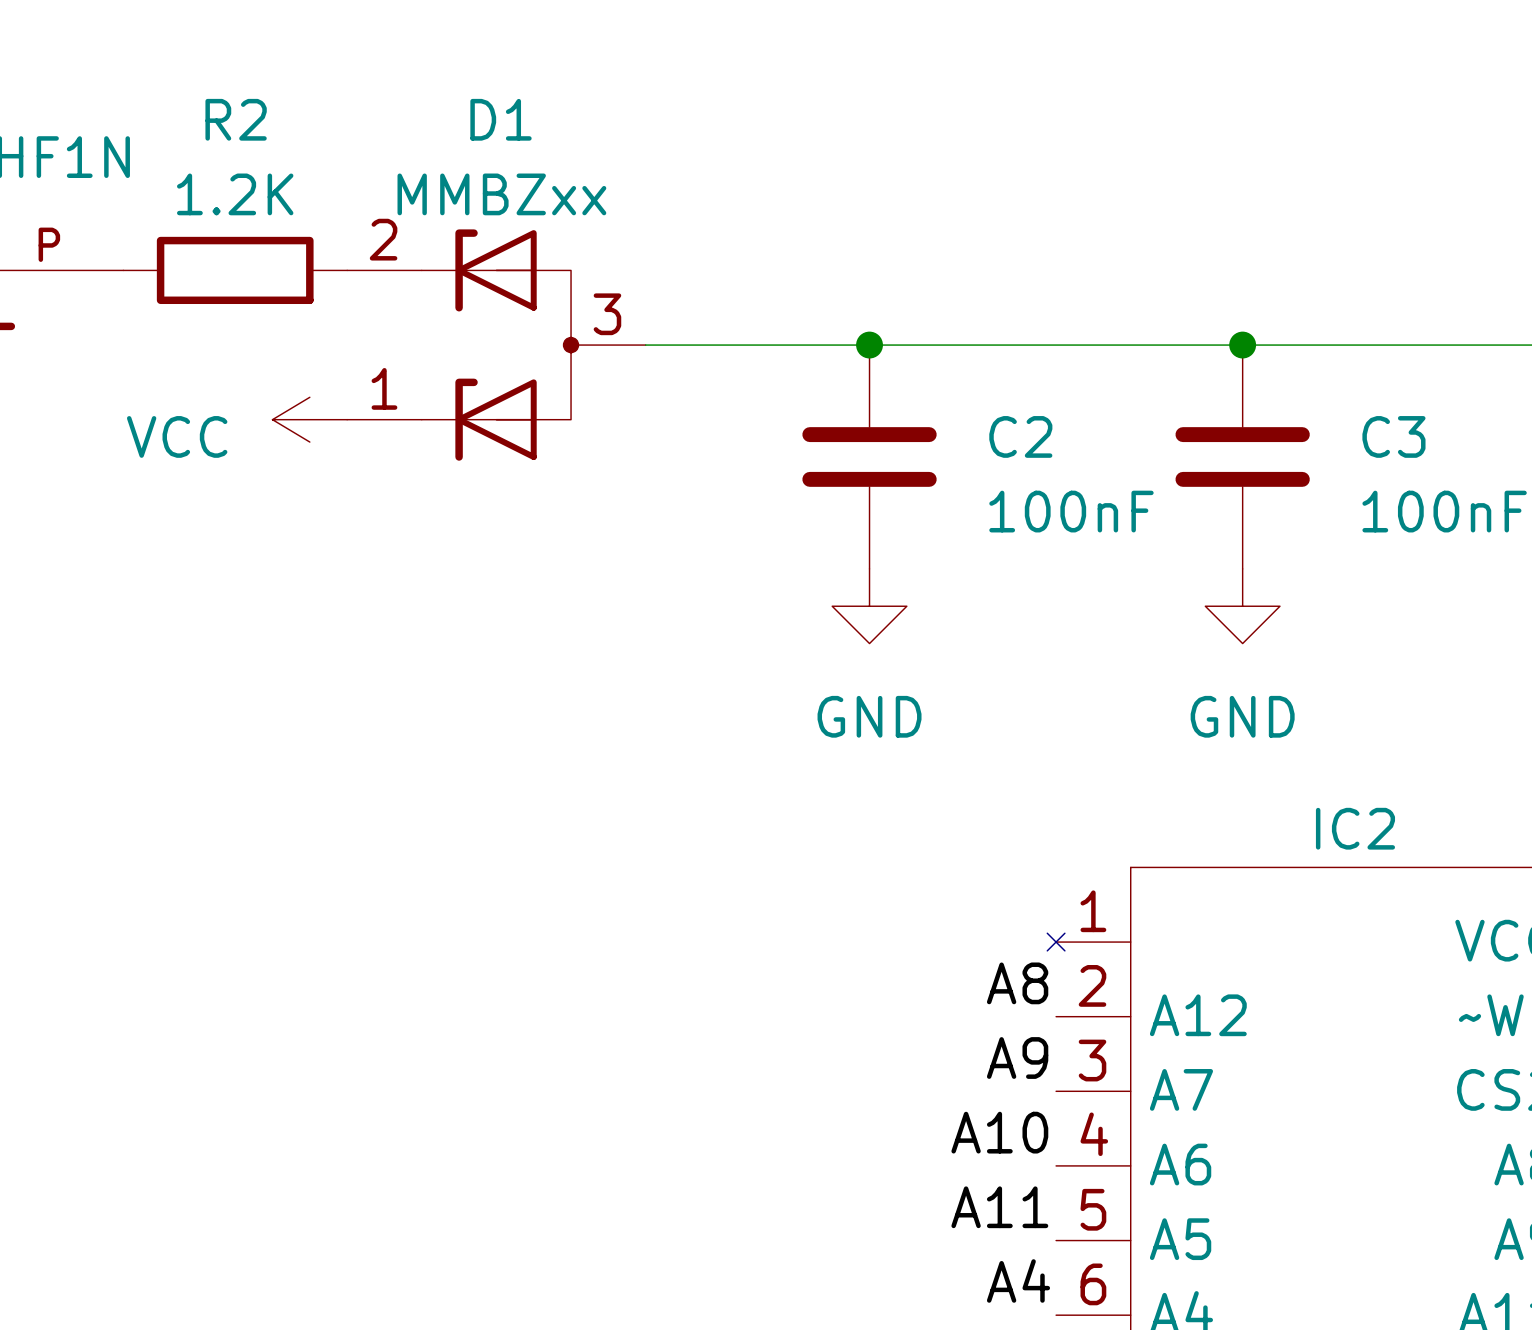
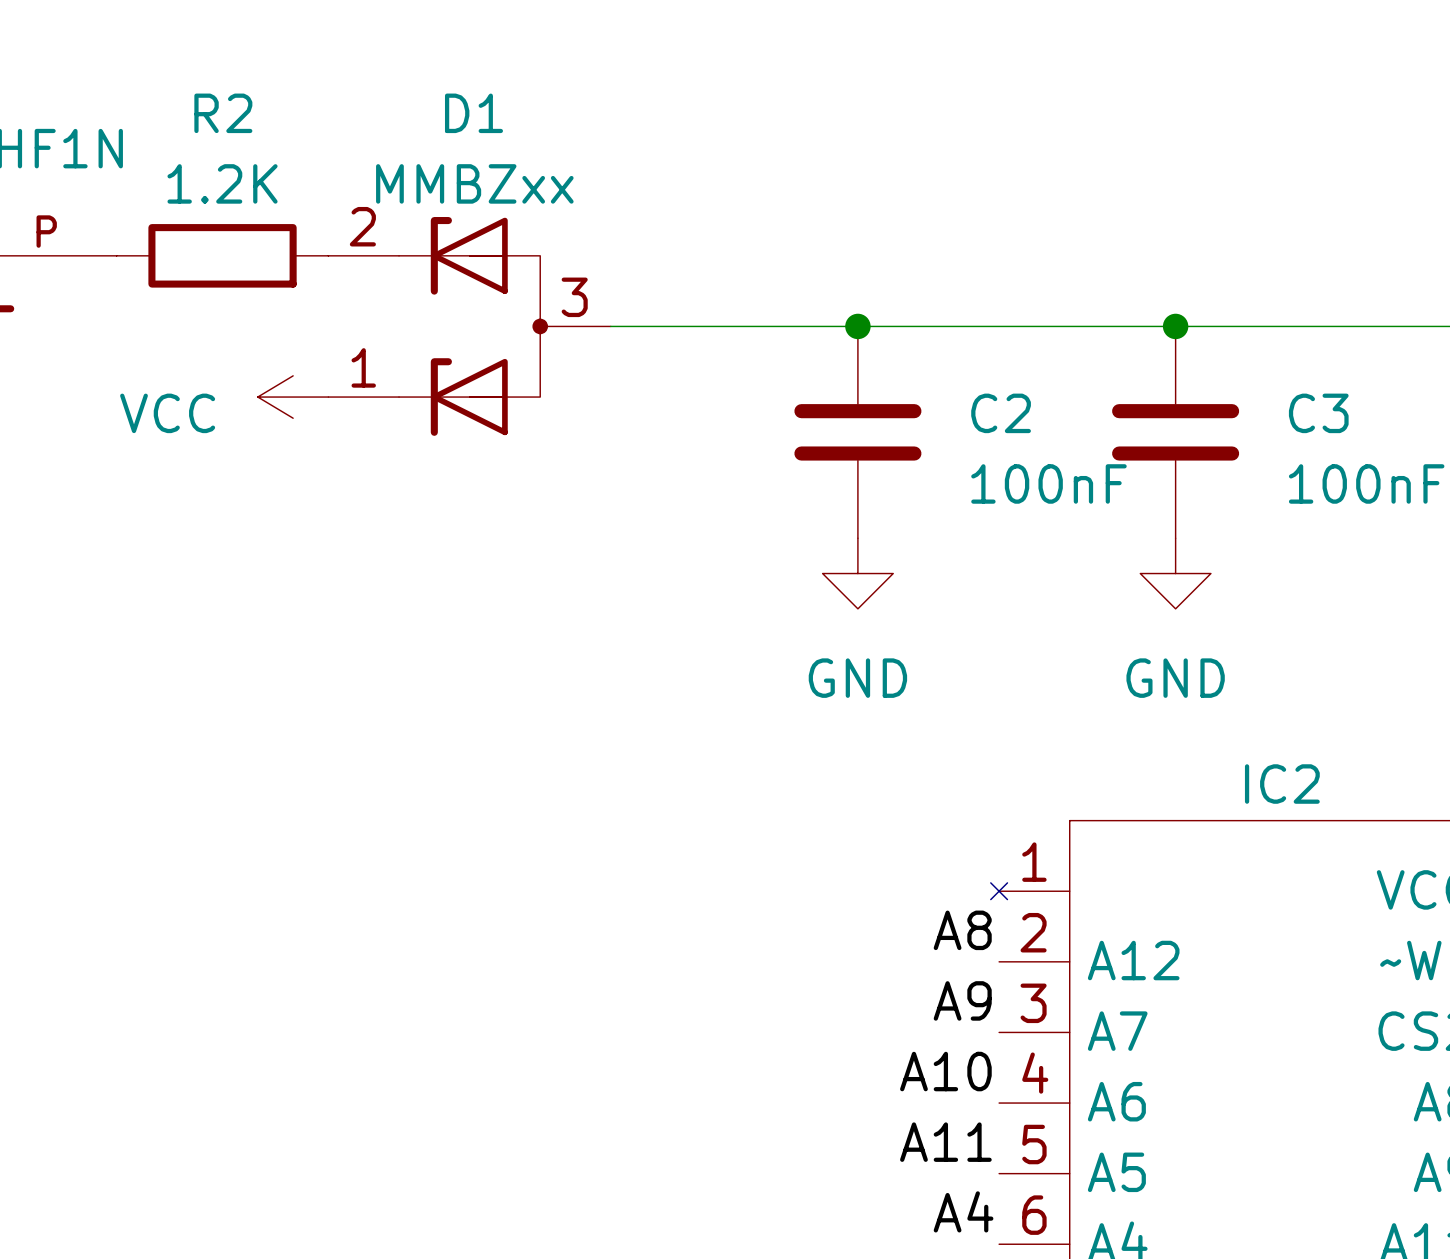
junction position: (869, 345) -> (857, 326)
C2 position: (869, 456) -> (857, 432)
power symbol position: GND (869, 606) -> GND (857, 573)

